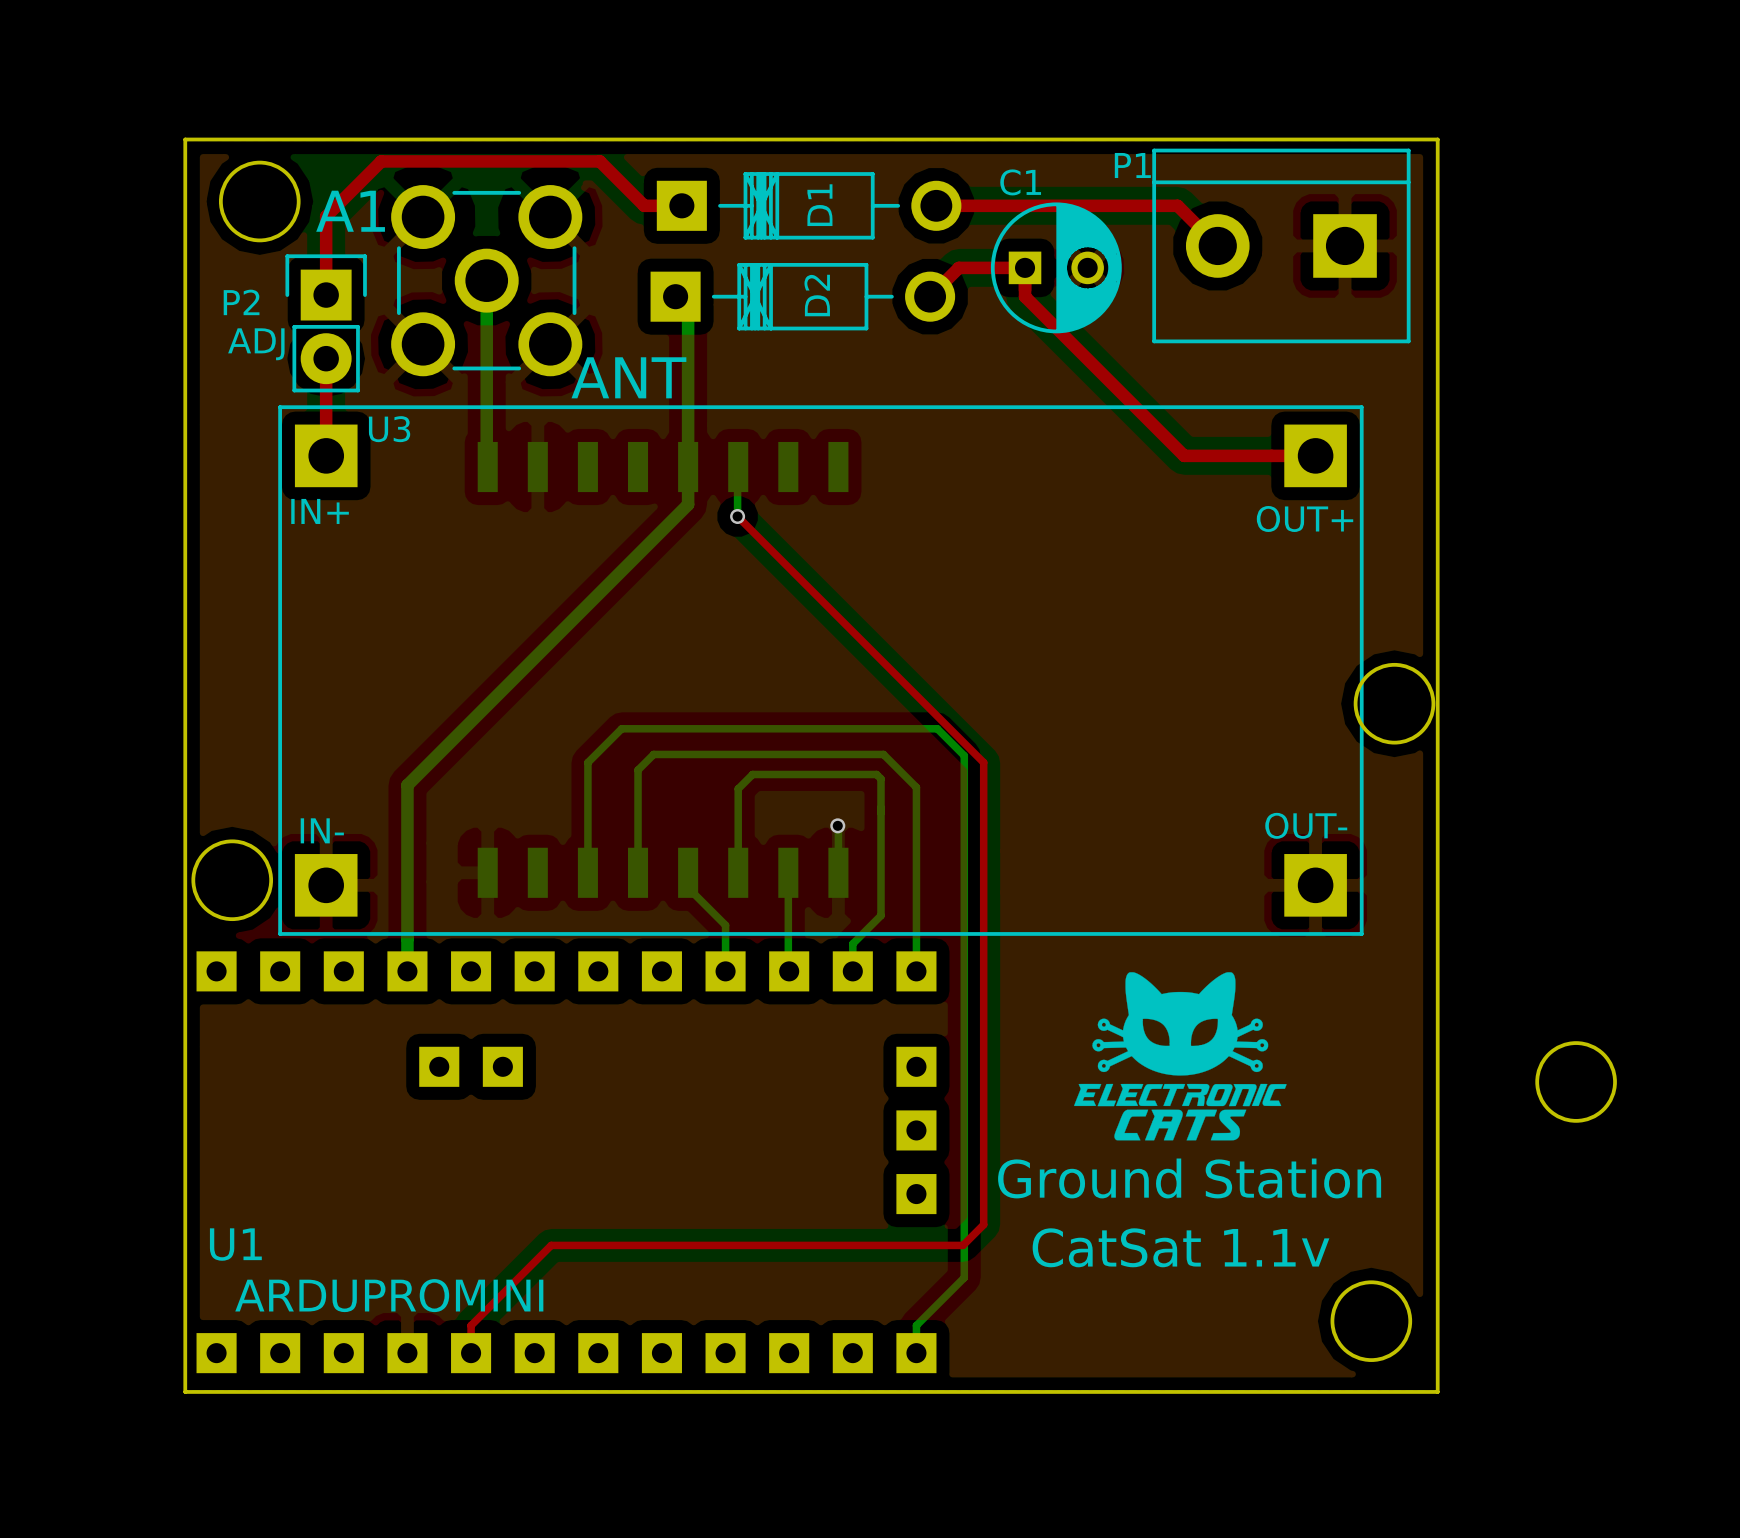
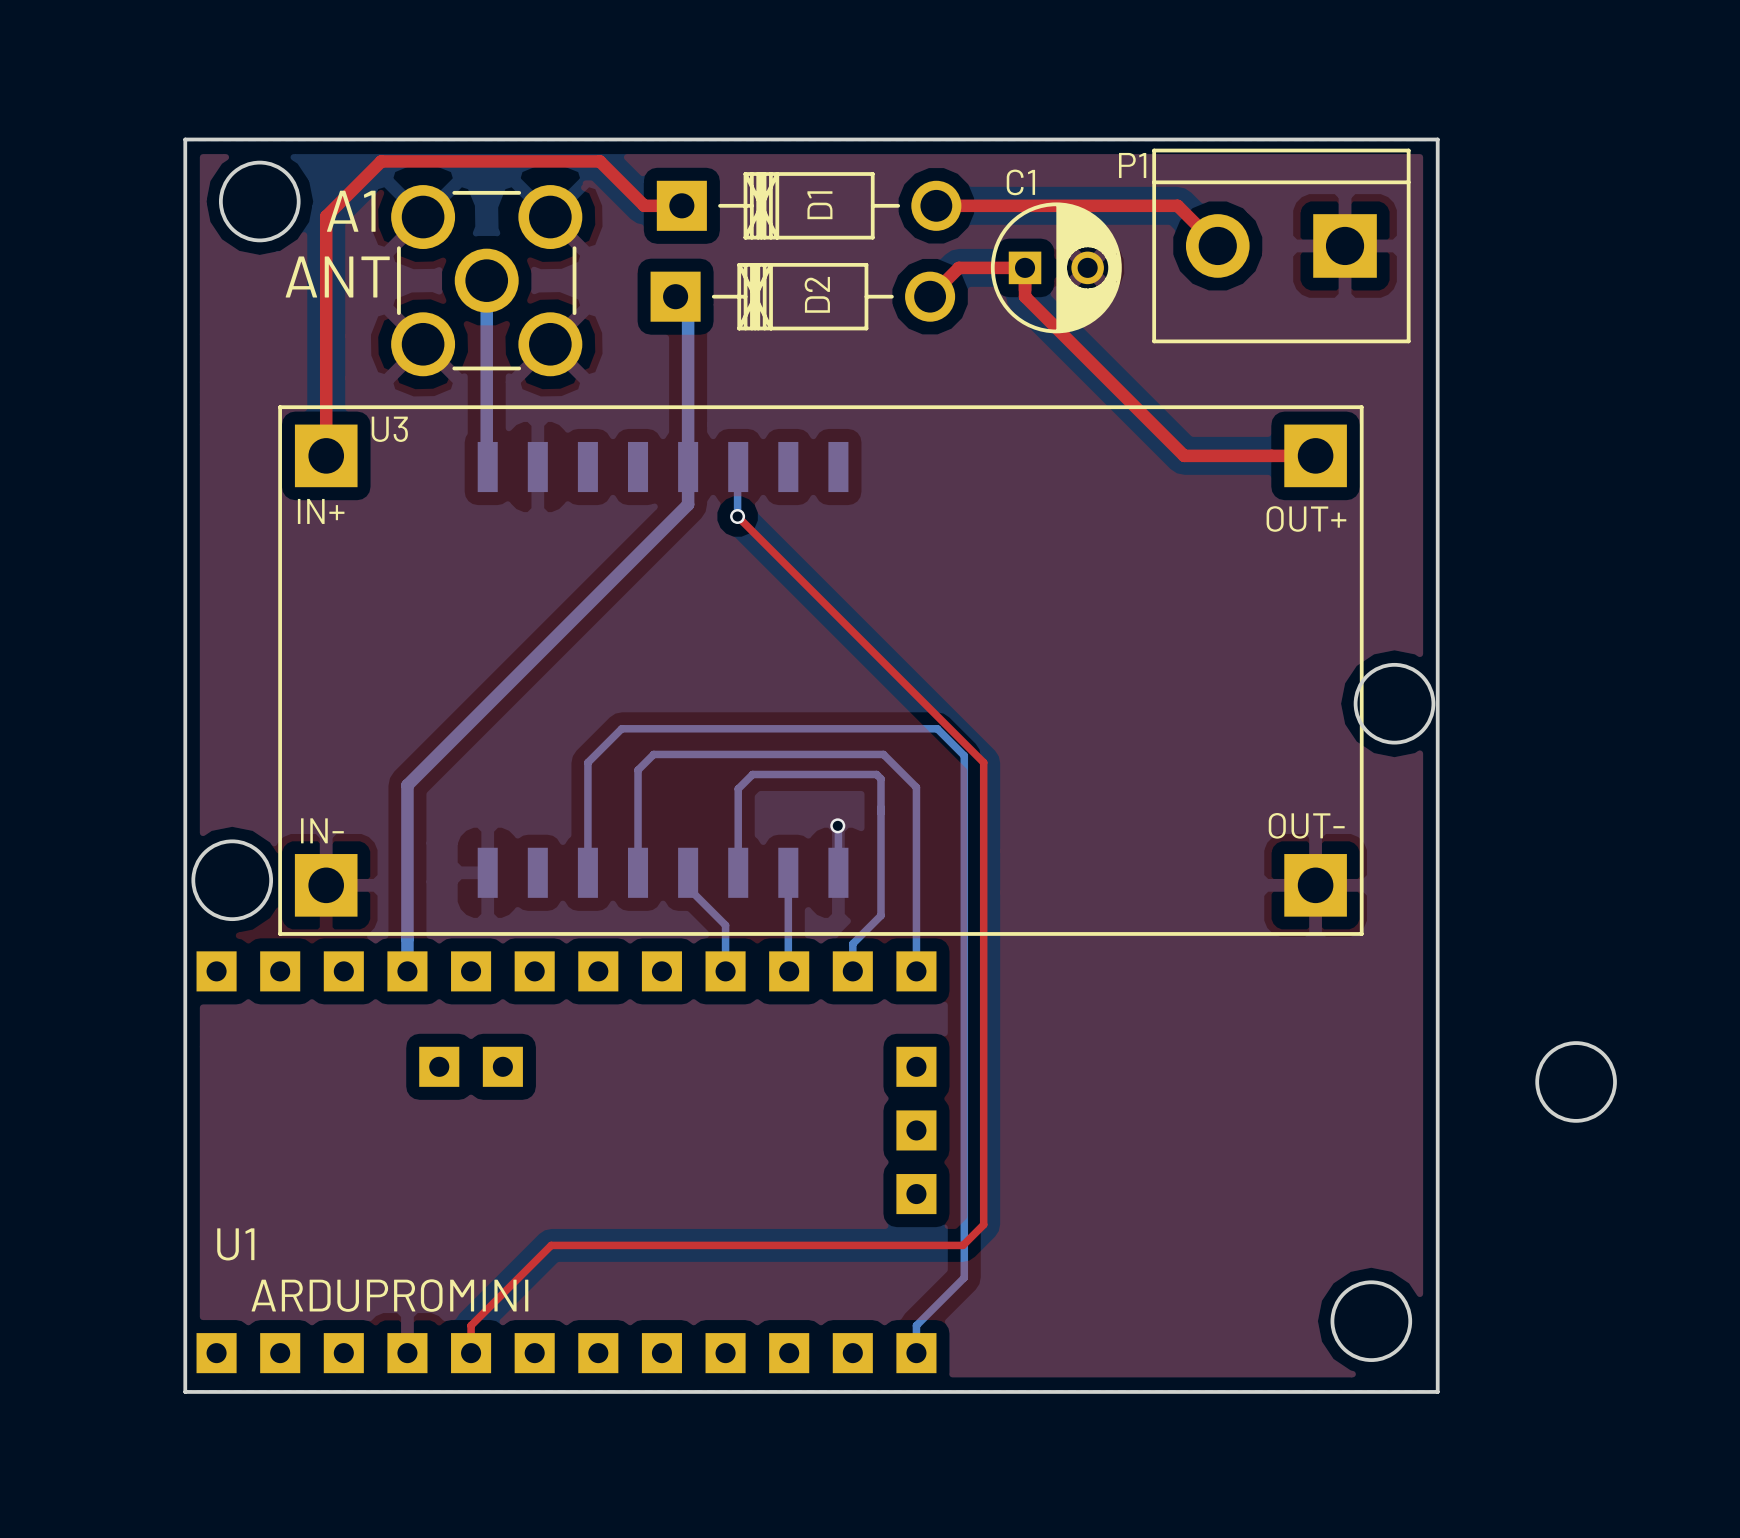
top track: none -> (326, 295) (326, 358)
P2: ADJ (326, 323) -> none
A1 value position: ANT (628, 377) -> ANT (337, 276)
drawing: [1074, 972, 1287, 1141] -> none
text: Ground Station (1189, 1178) -> none
text: CatSat 1.1v (1181, 1247) -> none

